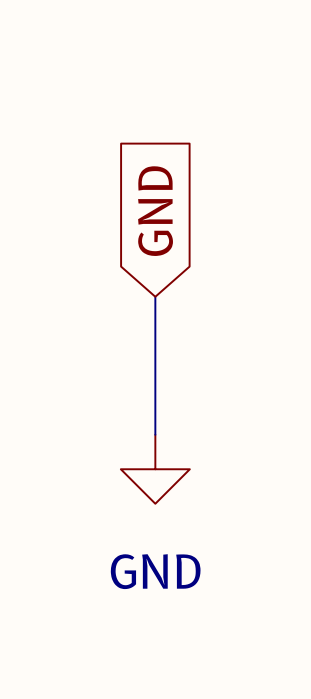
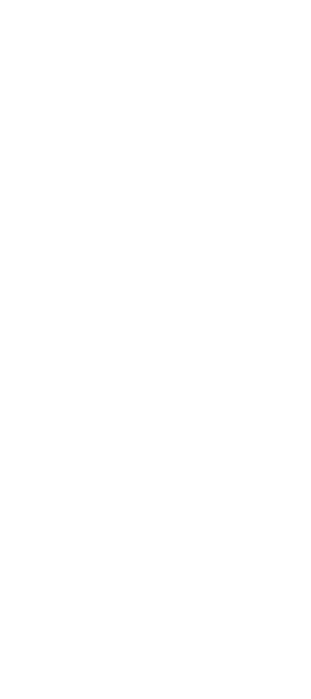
global label: GND (155, 211) -> none
wire: (155, 296) (155, 434) -> none
power symbol: GND (155, 469) -> none

